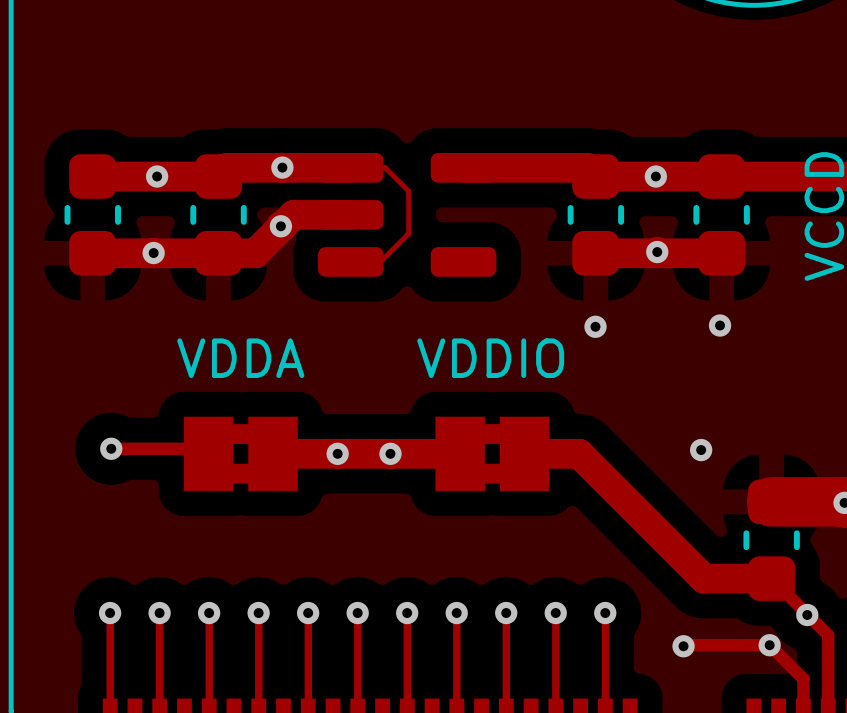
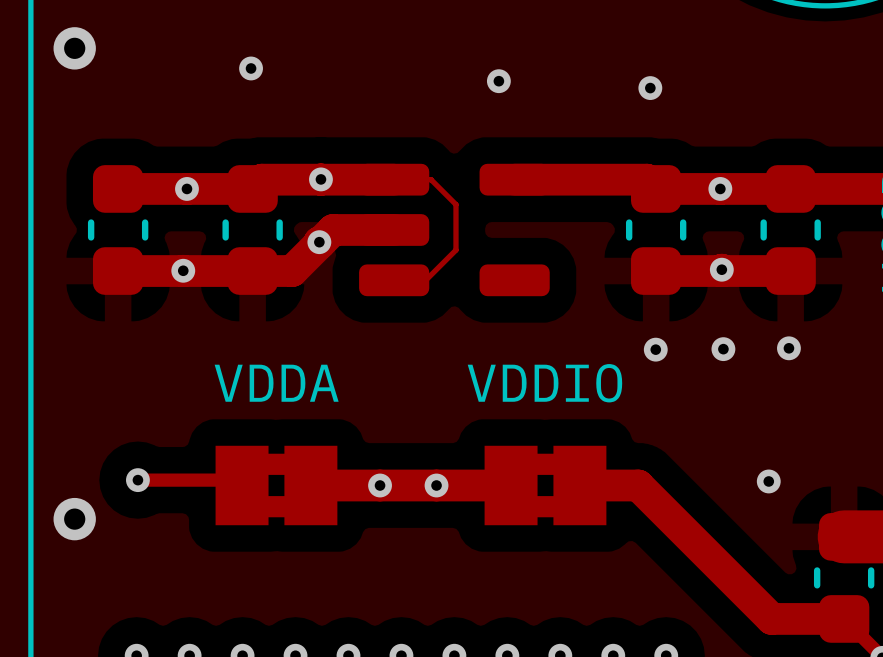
via: none -> (74, 48)
via: none -> (251, 68)
via: none -> (498, 81)
via: none -> (650, 88)
via: none -> (723, 349)
via: none -> (74, 519)

